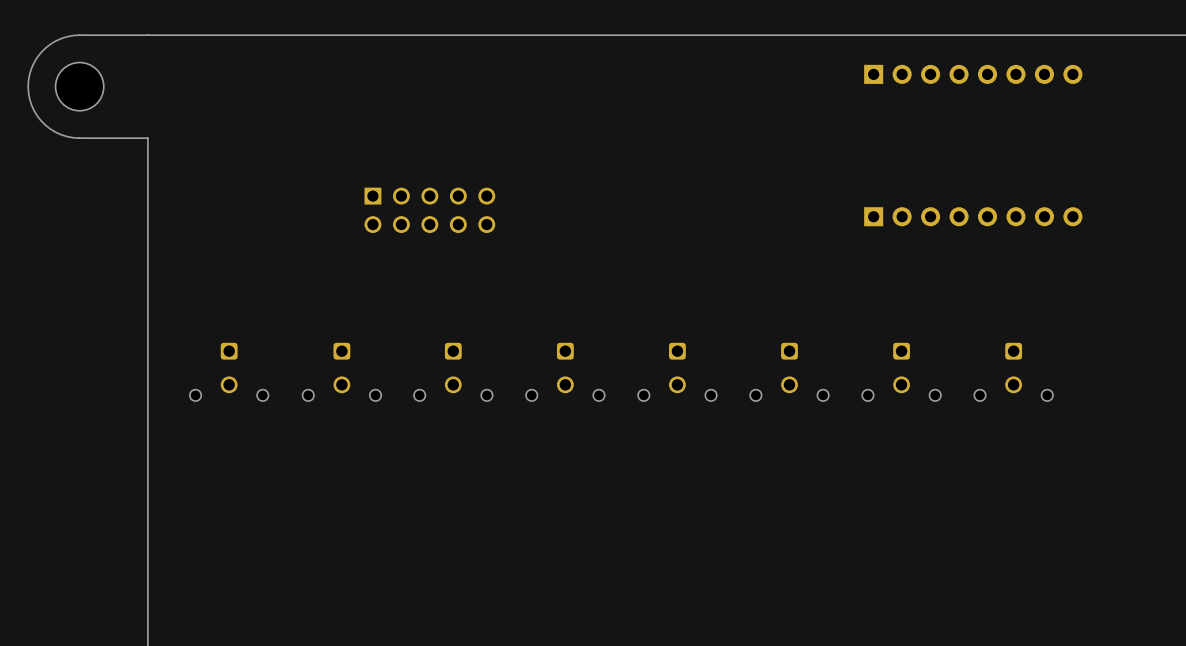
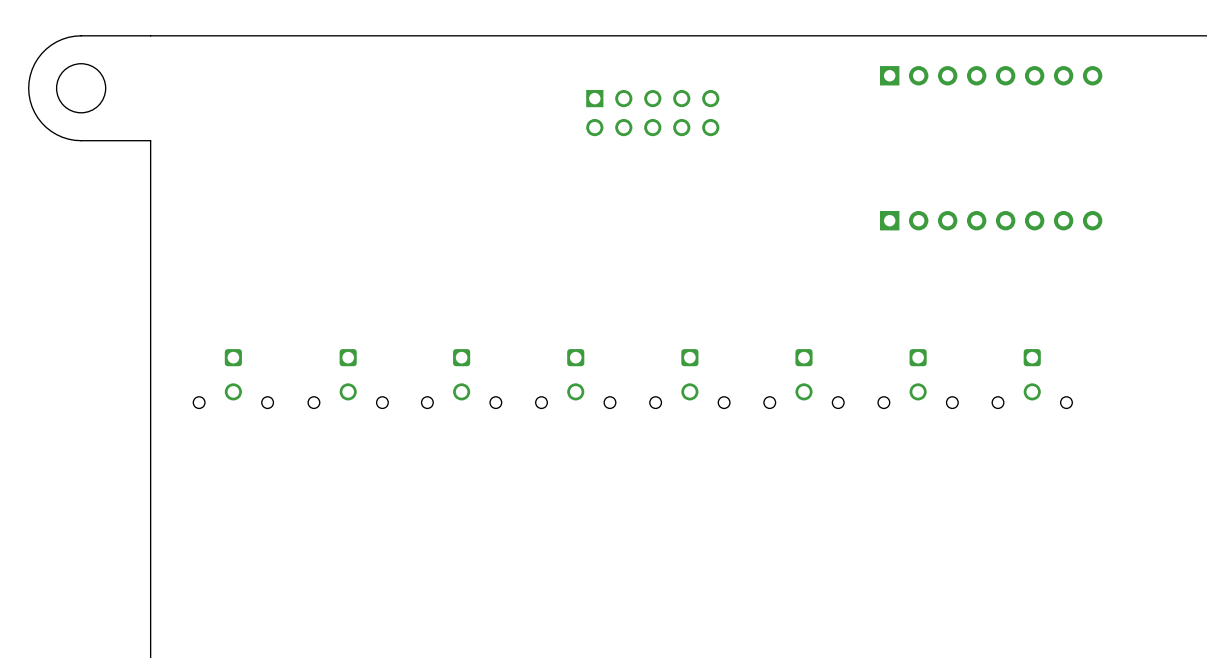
part position: (429, 210) -> (652, 113)

